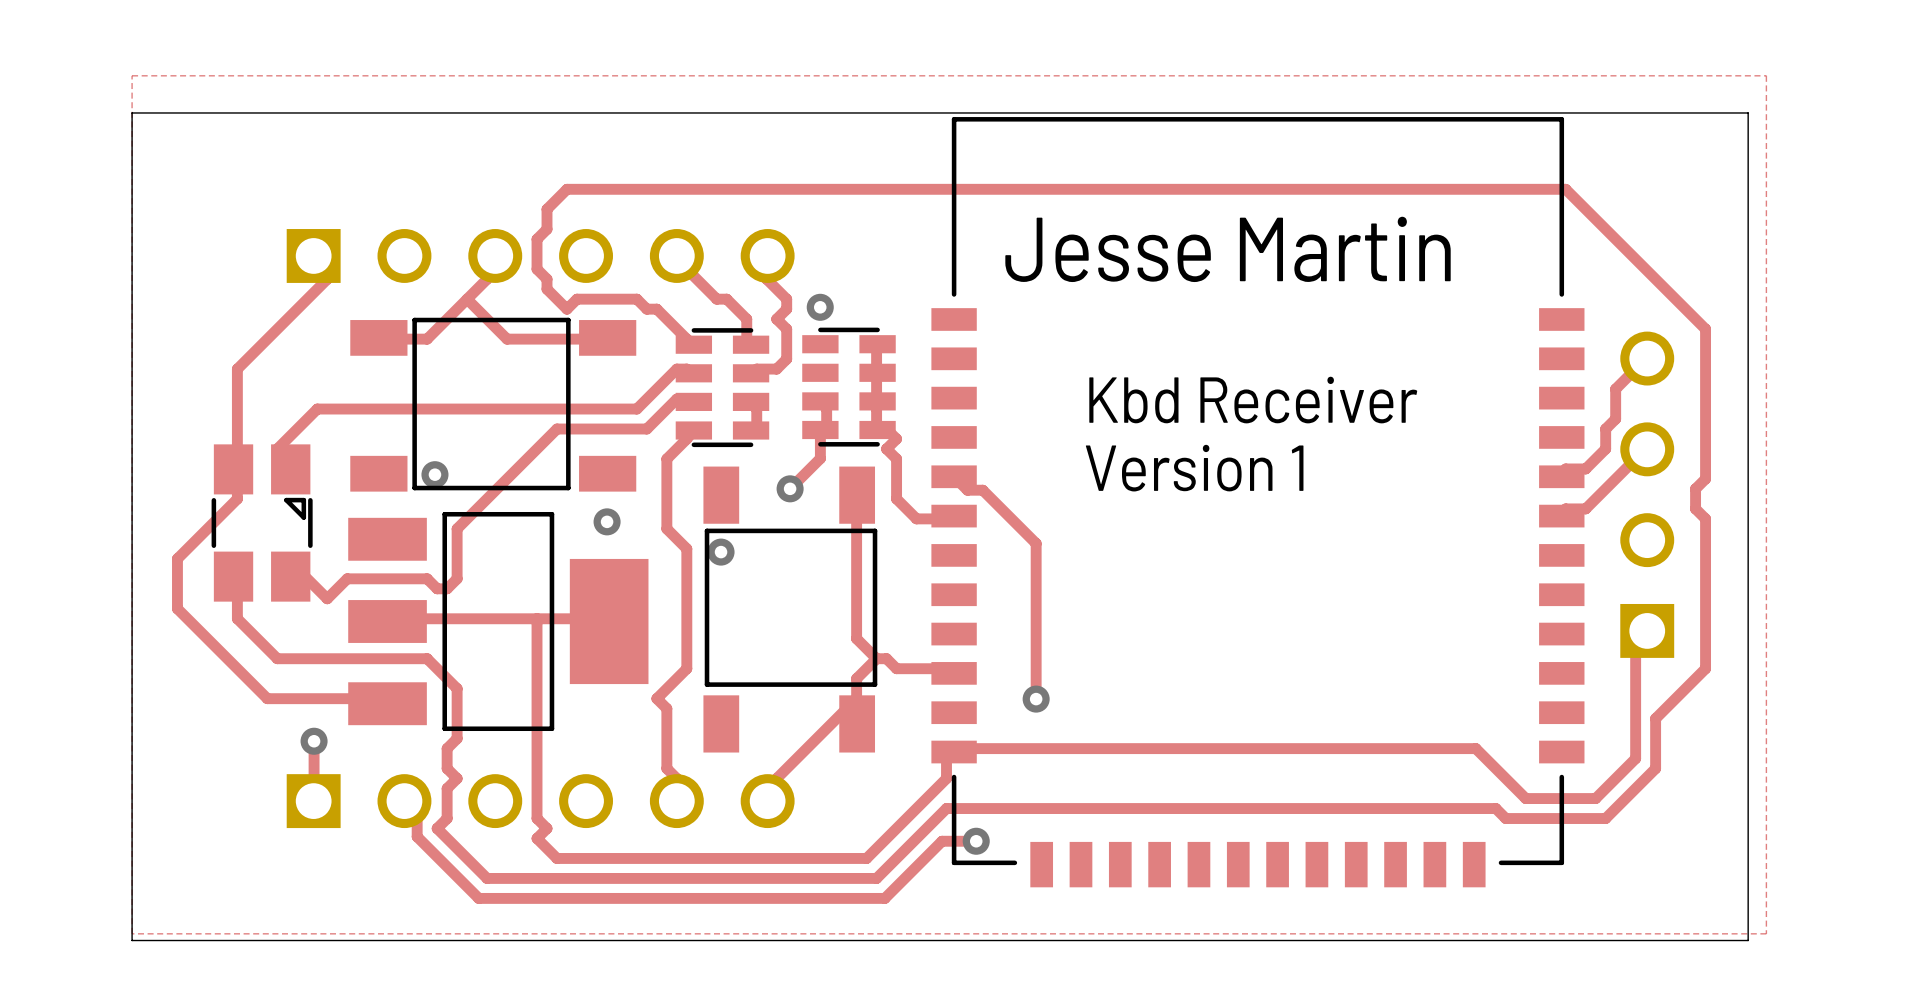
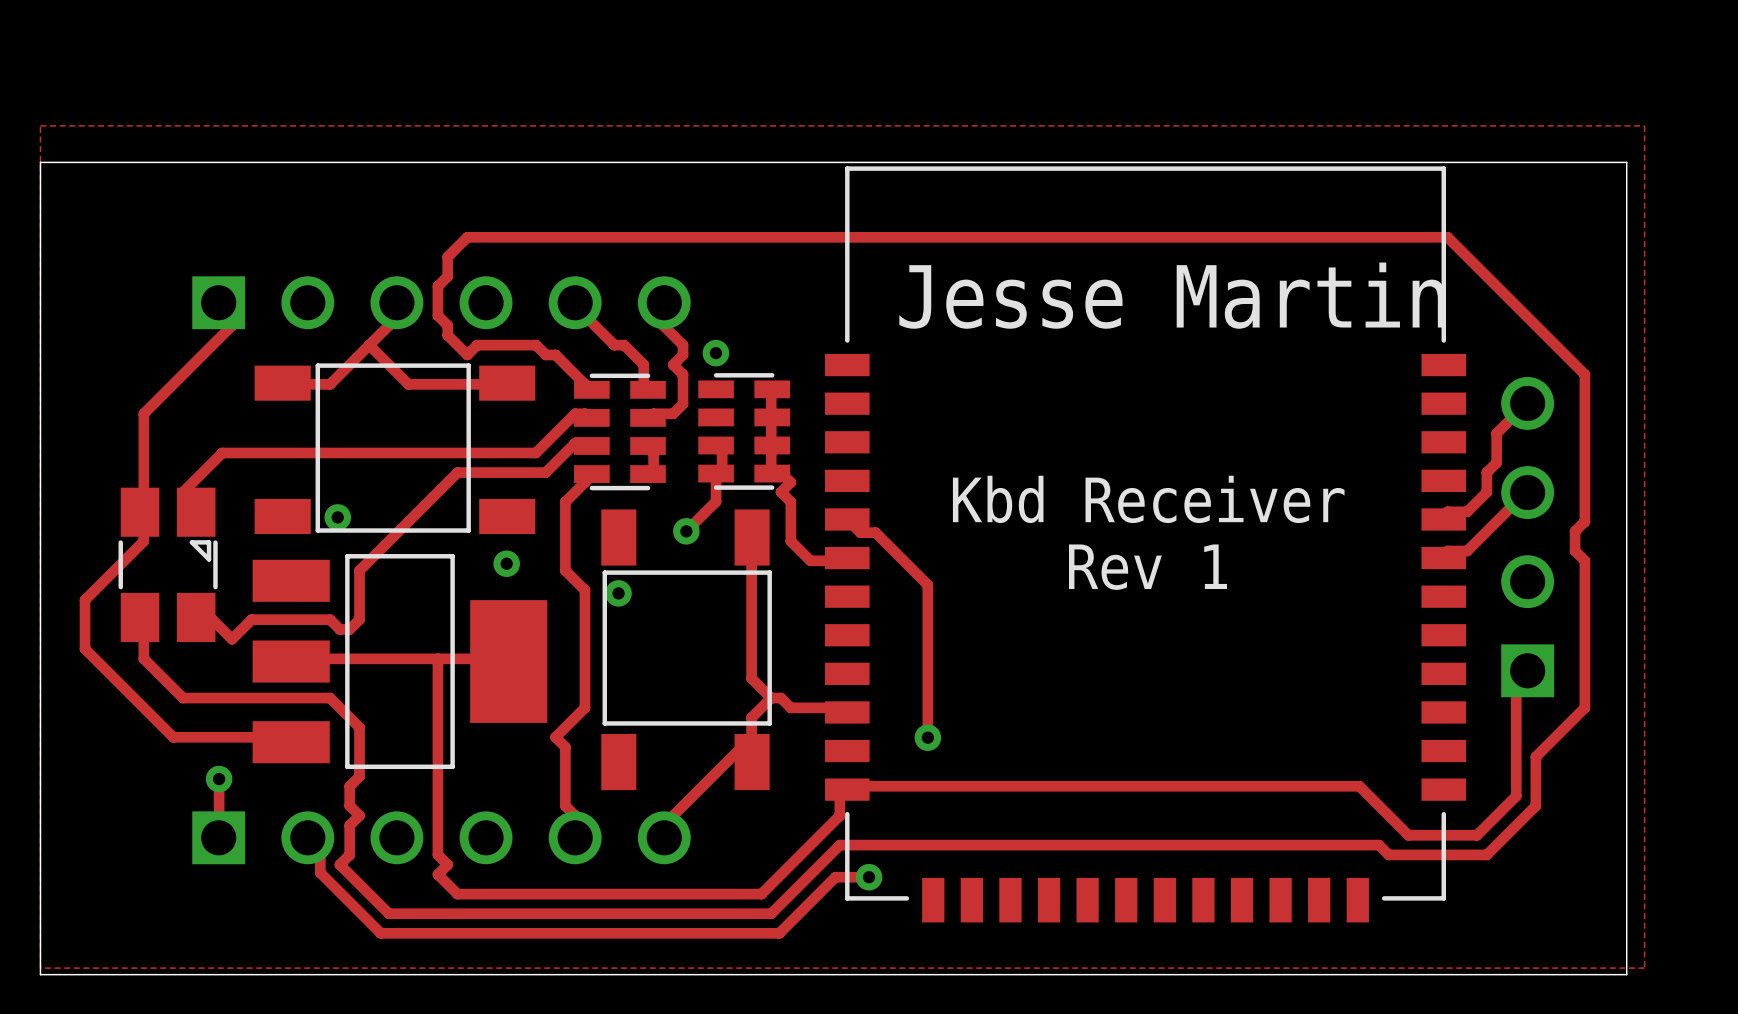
text position: Kbd Receiver (1253, 400) -> Kbd Receiver (1148, 499)
text: Version 1 (1194, 468) -> none
text: none -> Rev 1 (1147, 567)

